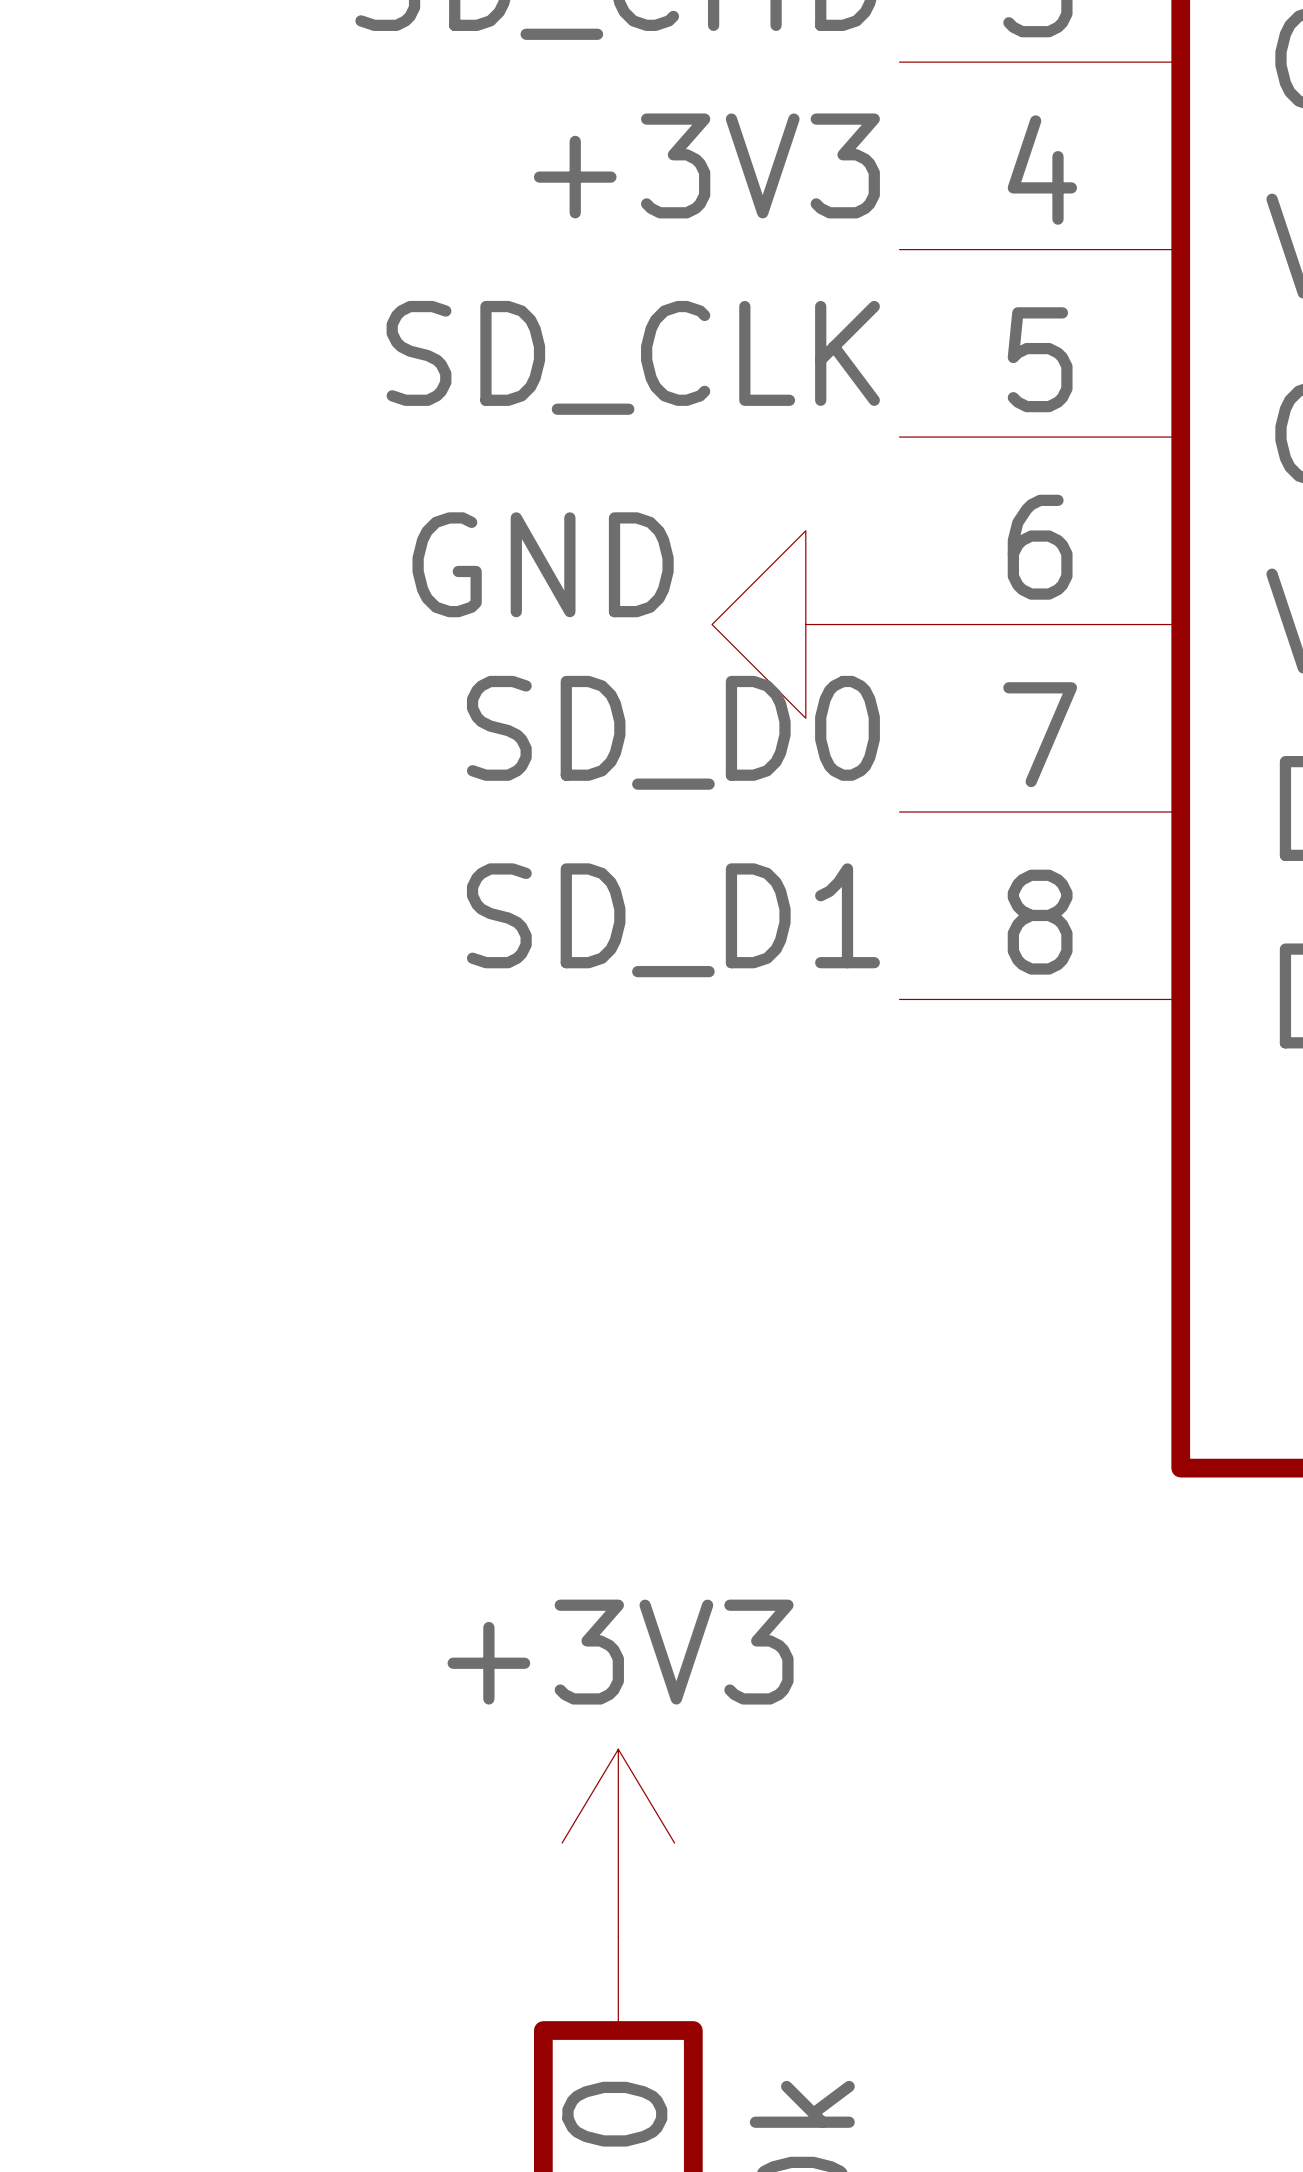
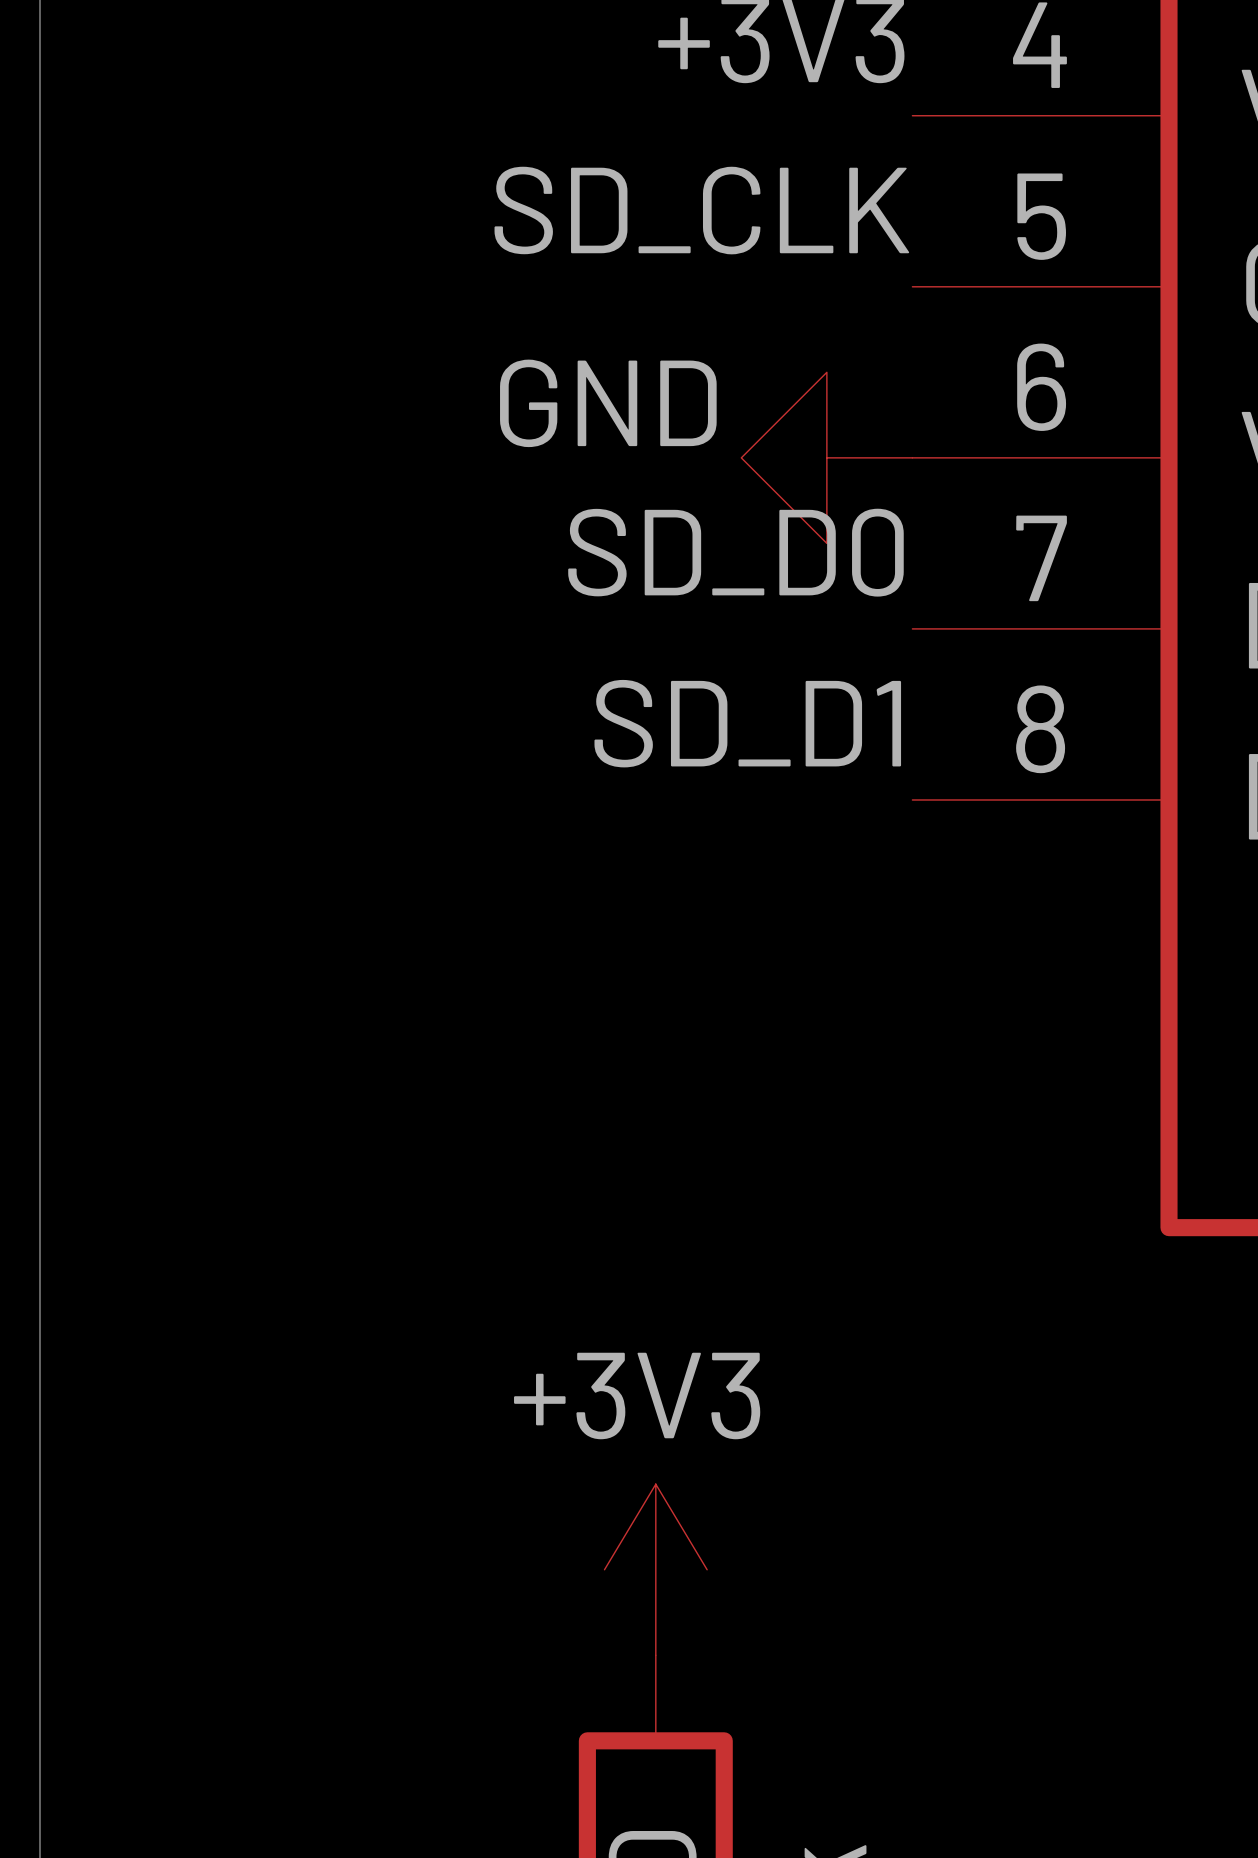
power symbol text position: +3V3 (620, 1652) -> +3V3 (637, 1395)

